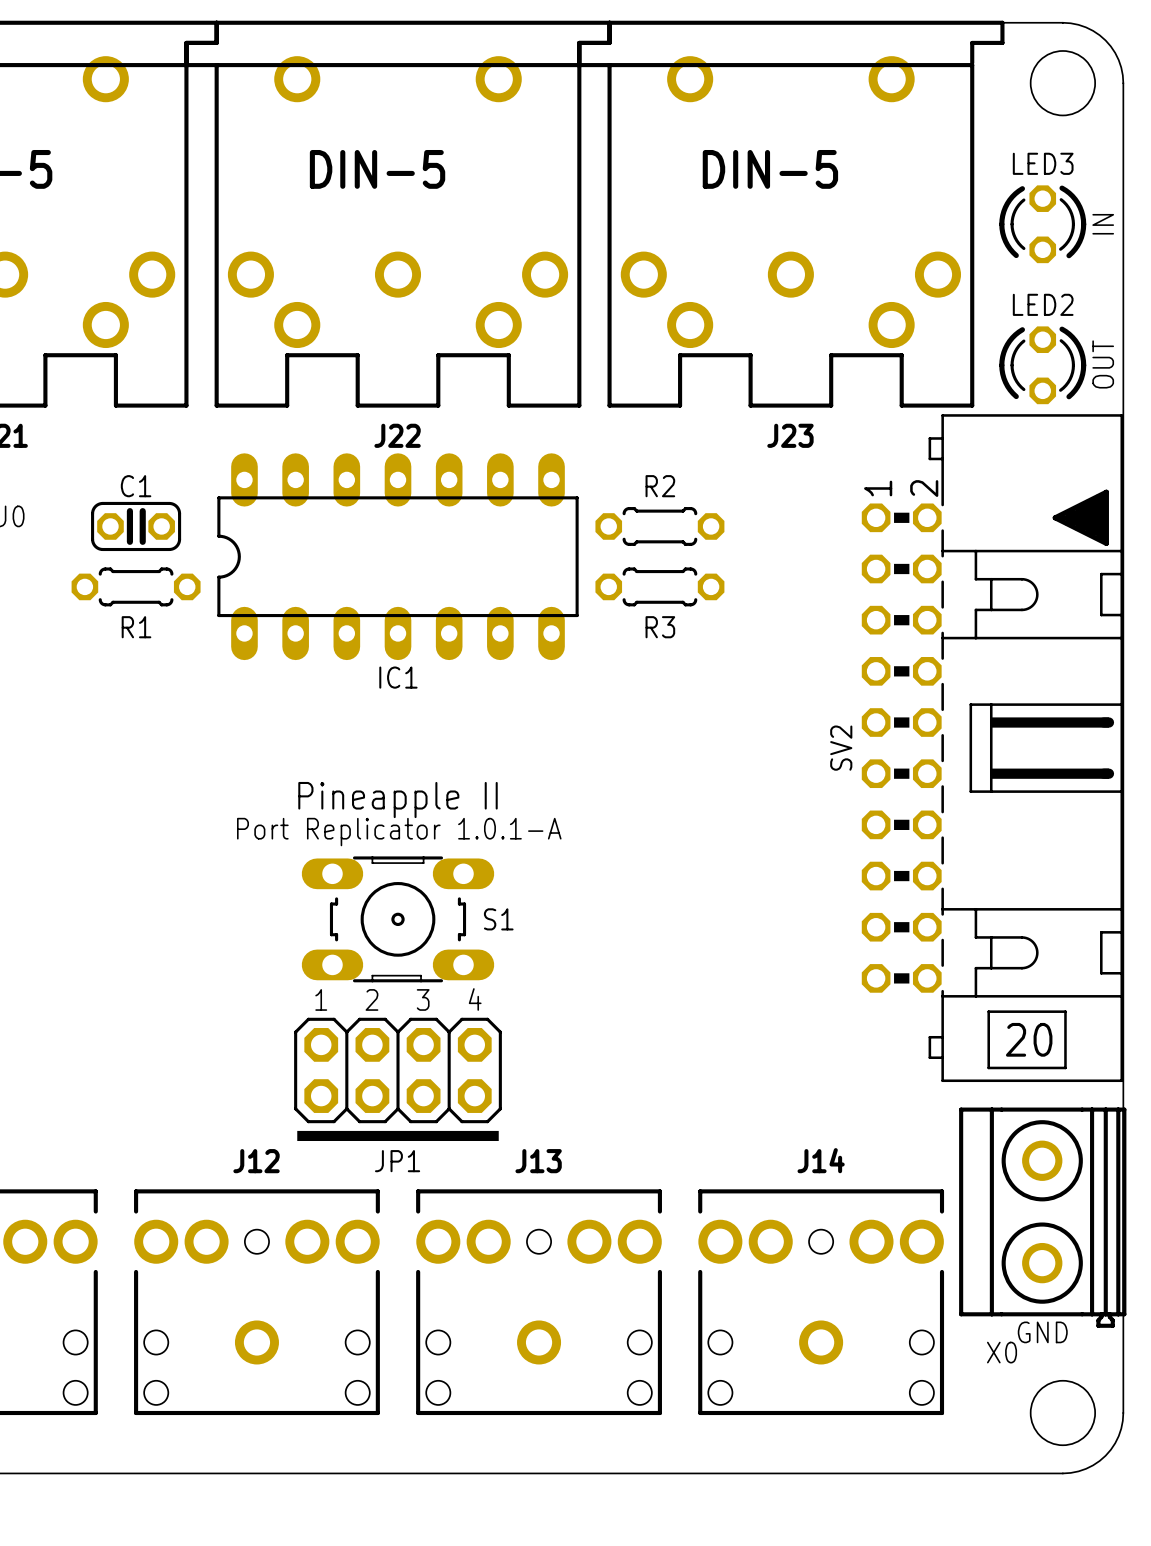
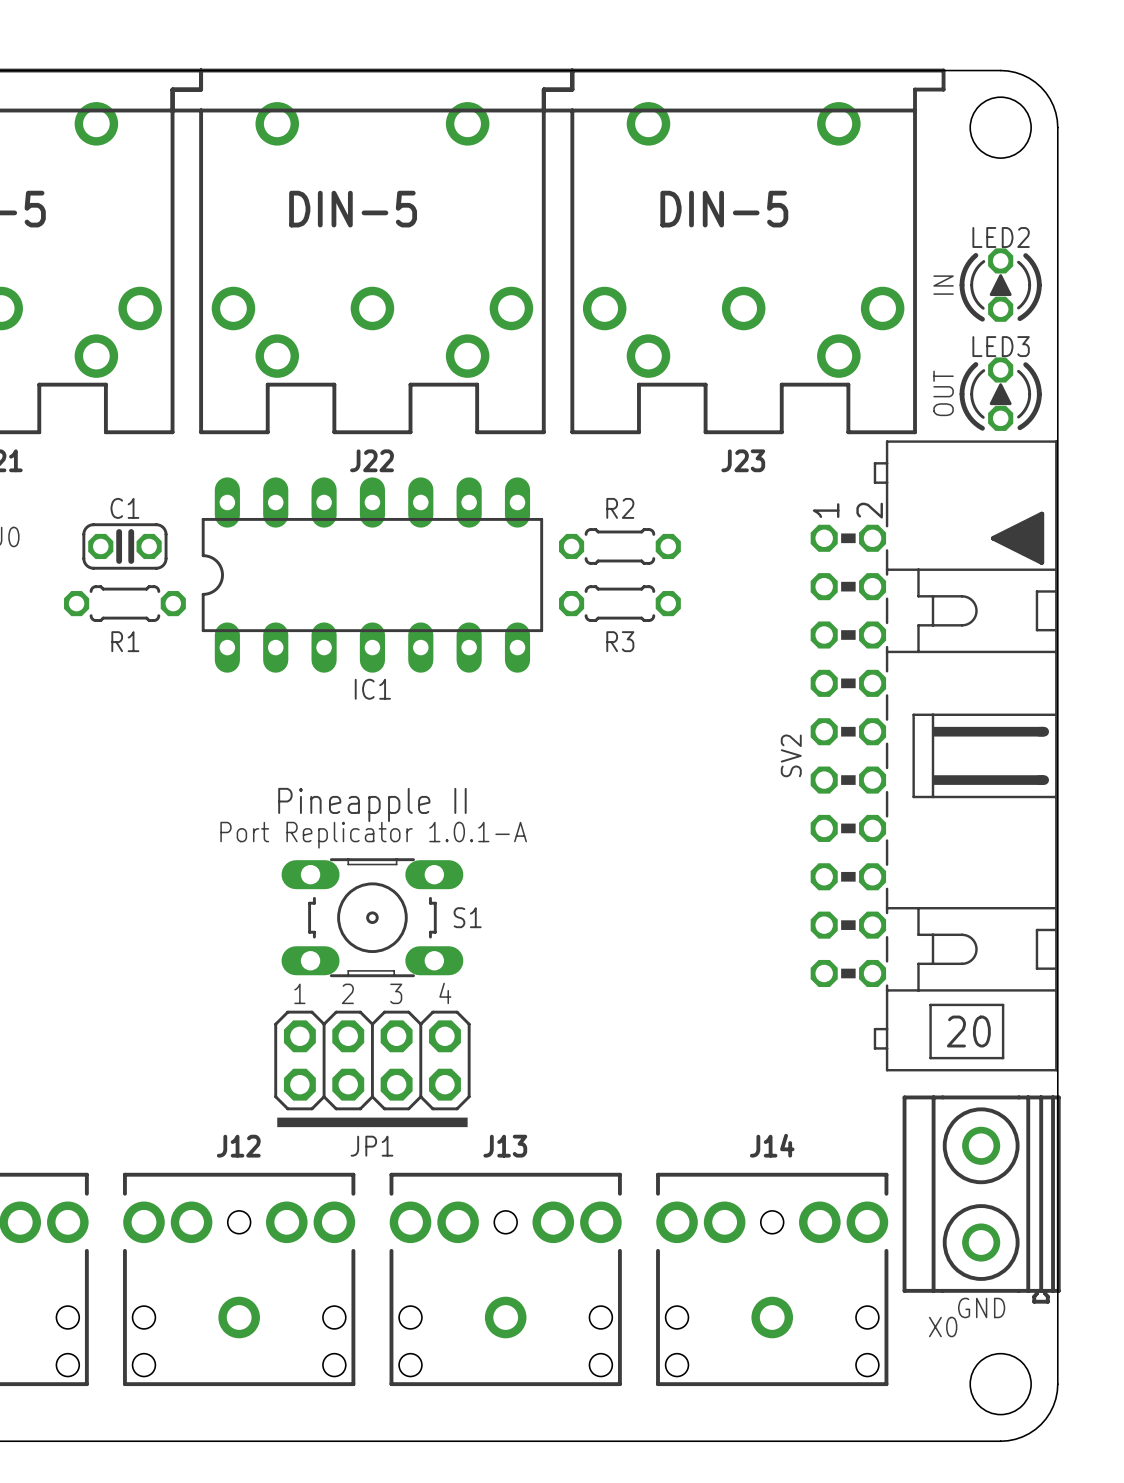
LED3 rotation: 0° (1042, 224) -> 180° (1000, 394)
LED3 position: (1042, 224) -> (1000, 394)
text position: IN (1103, 224) -> IN (943, 285)
drawing: none -> [989, 274, 1012, 297]
drawing: none -> [989, 383, 1012, 406]
text position: OUT (1103, 364) -> OUT (943, 393)
LED2 rotation: 0° (1042, 365) -> 180° (1000, 285)
LED2 position: (1042, 365) -> (1000, 285)

